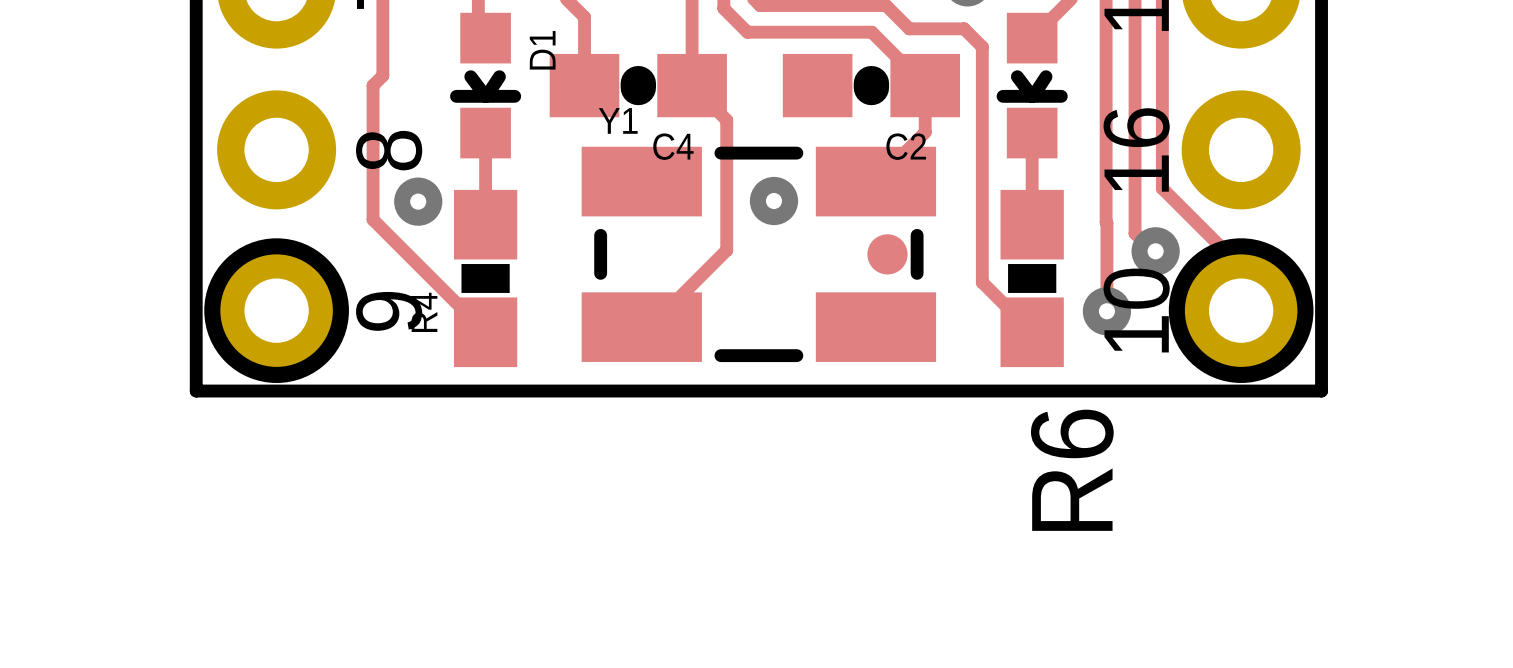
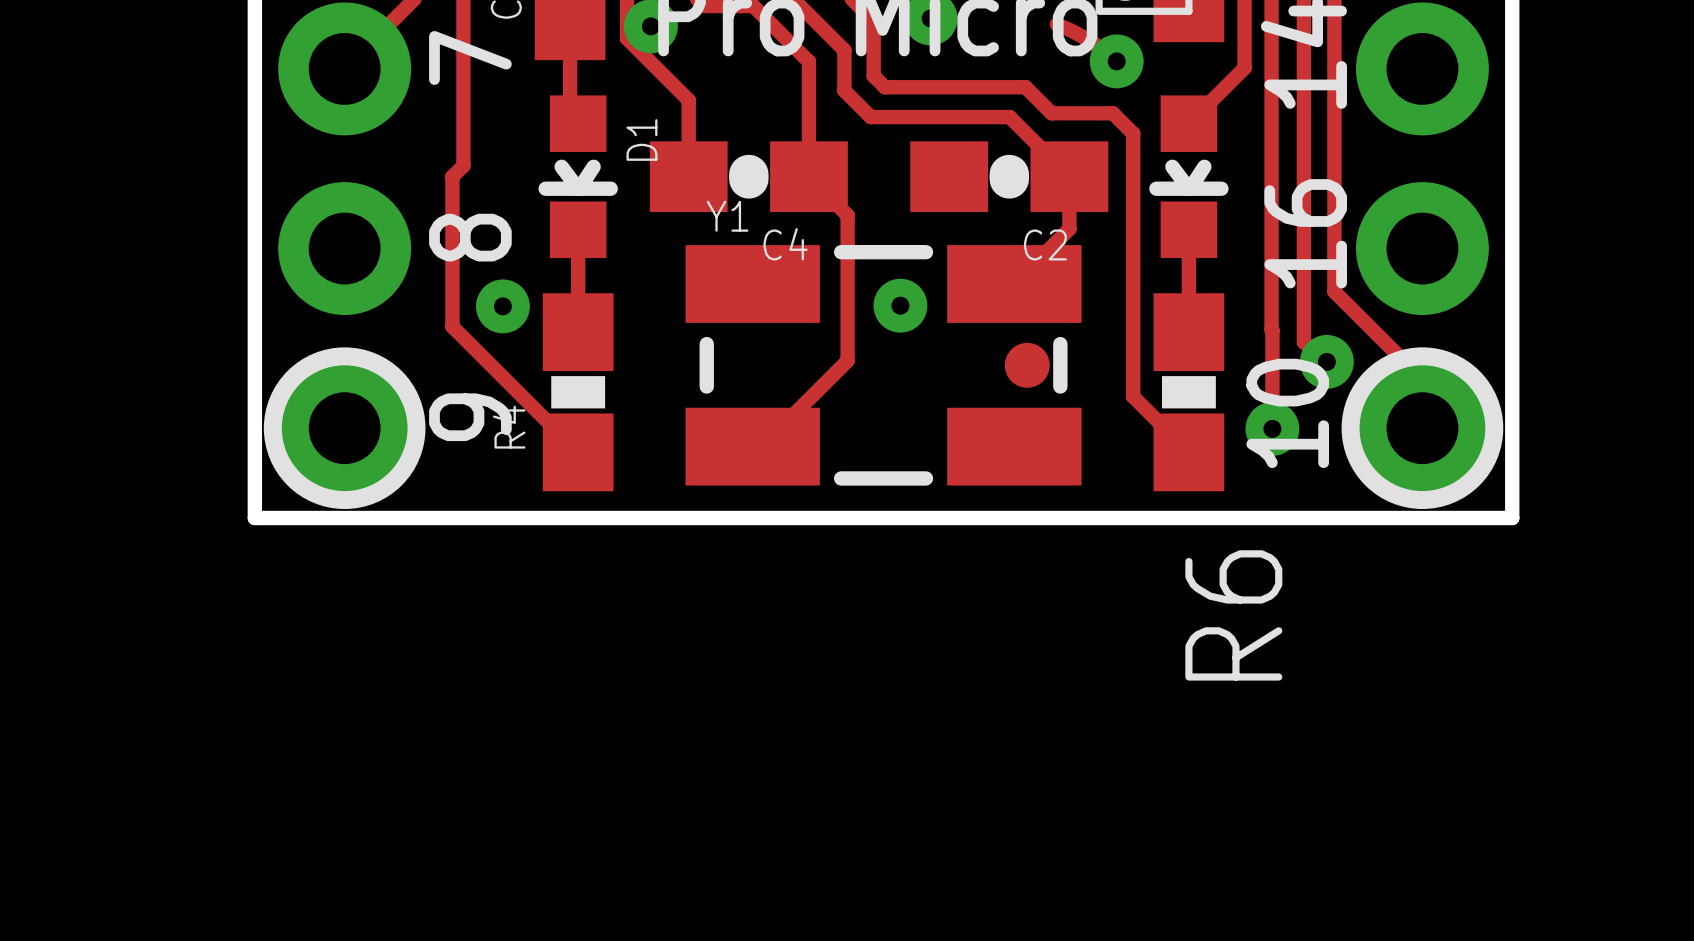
text position: 10 (1136, 310) -> 10 (1287, 413)

